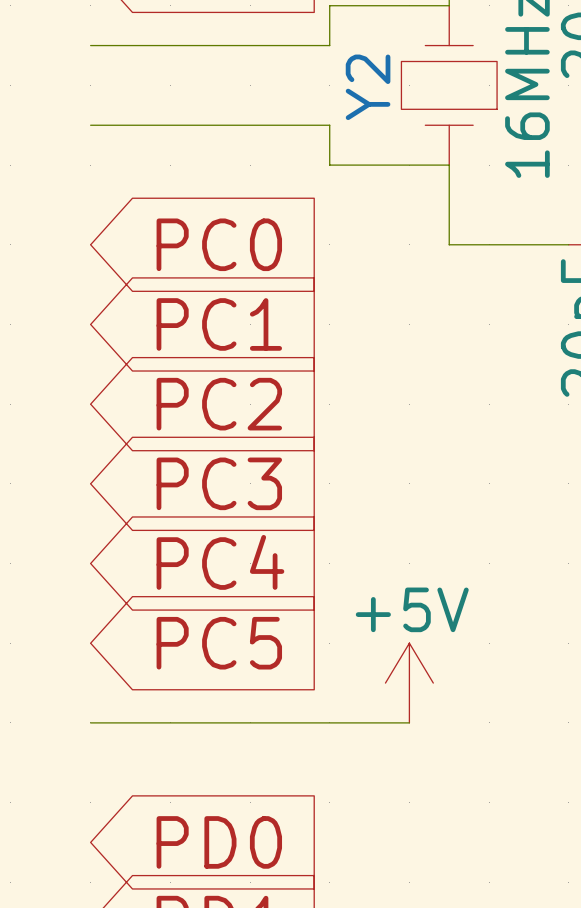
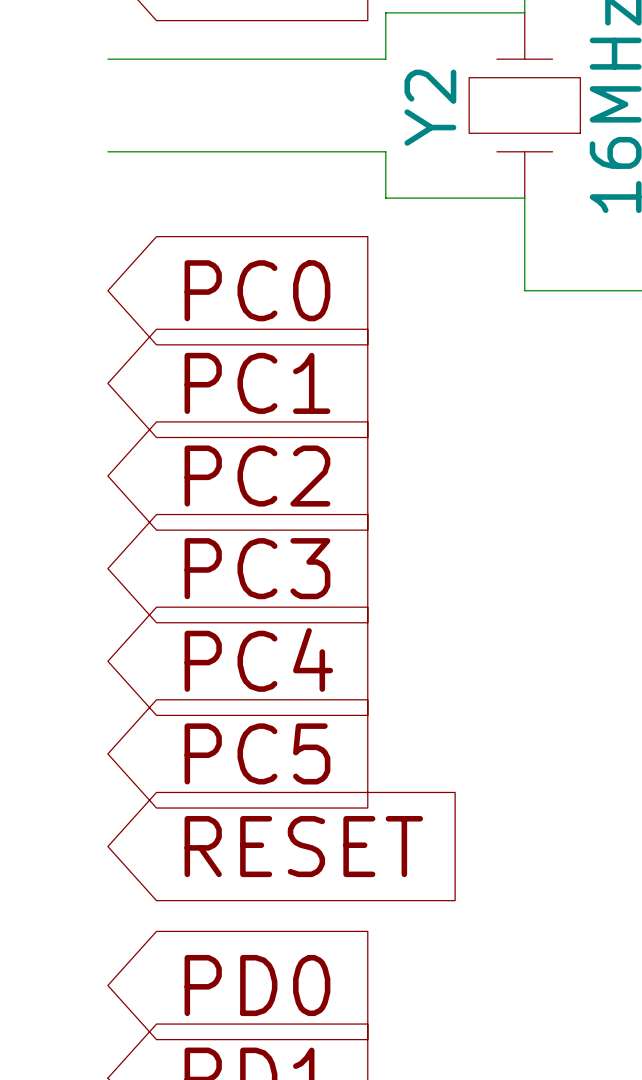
power symbol: +5V (409, 683) -> none
wire: (90, 722) (409, 722) -> none
global label: none -> RESET (303, 846)

